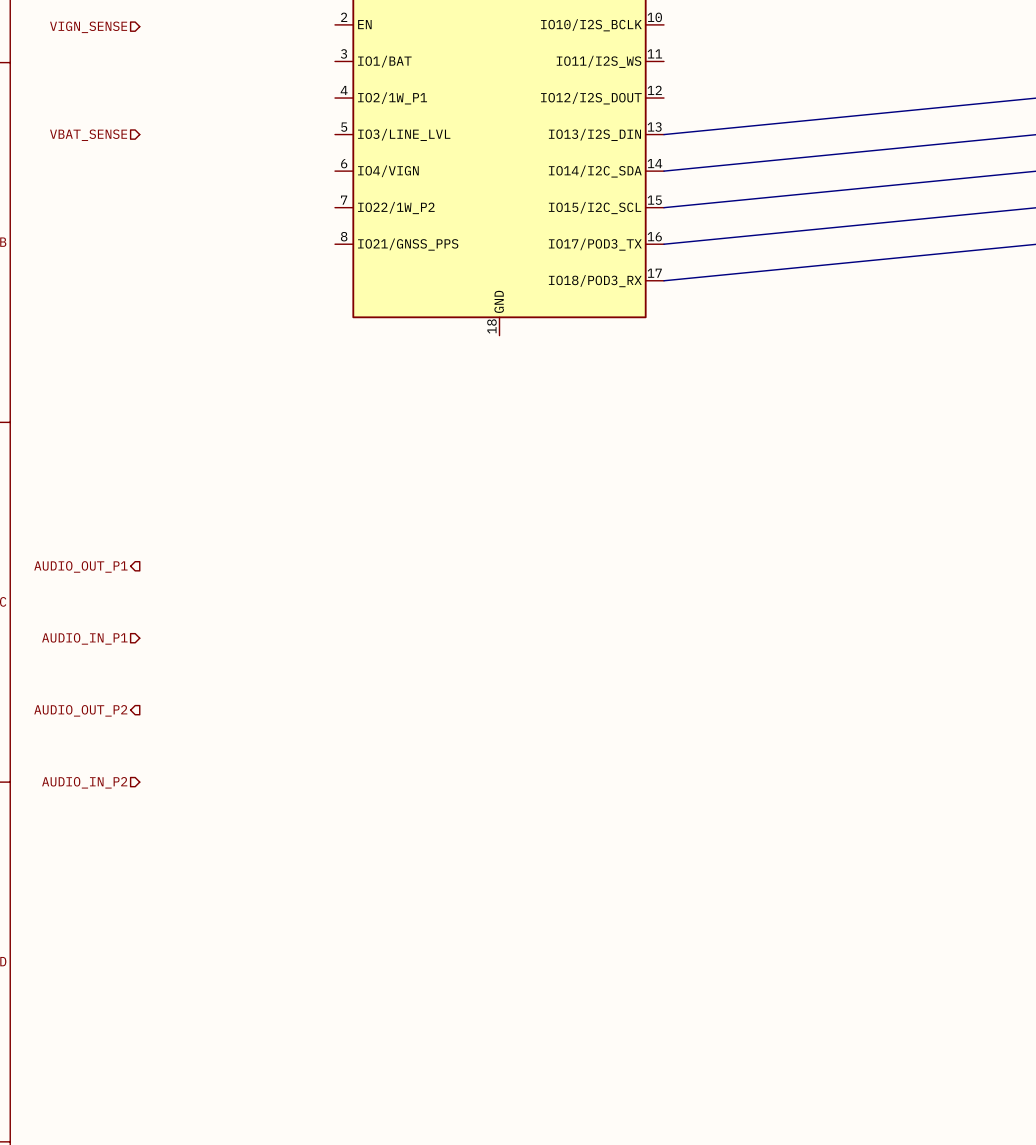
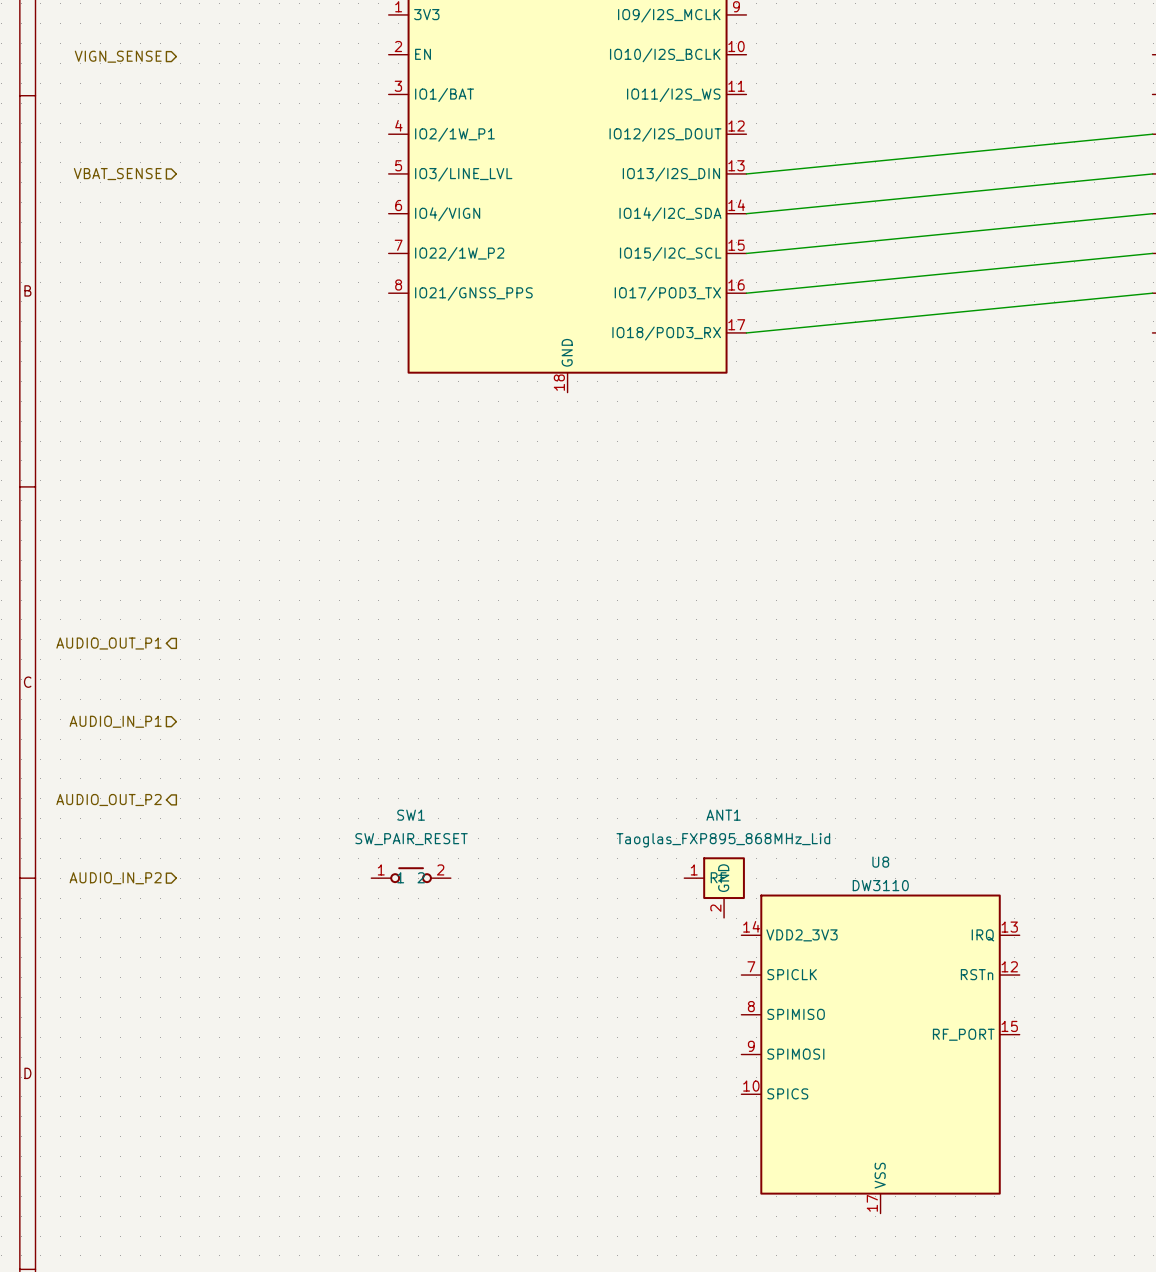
SW1: none -> SW_PAIR_RESET (411, 875)
ANT1: none -> Taoglas_FXP895_868MHz_Lid (714, 887)
U8: none -> DW3110 (880, 1054)

